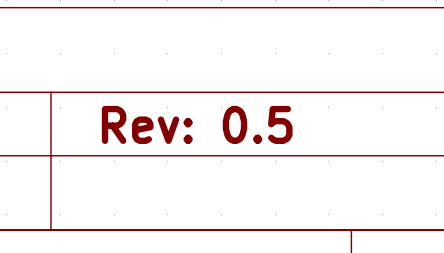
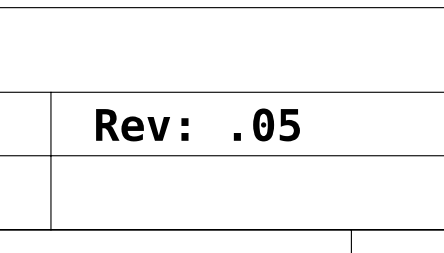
title block: Rev: 0.5 (197, 124) -> Rev: .05 (198, 124)

